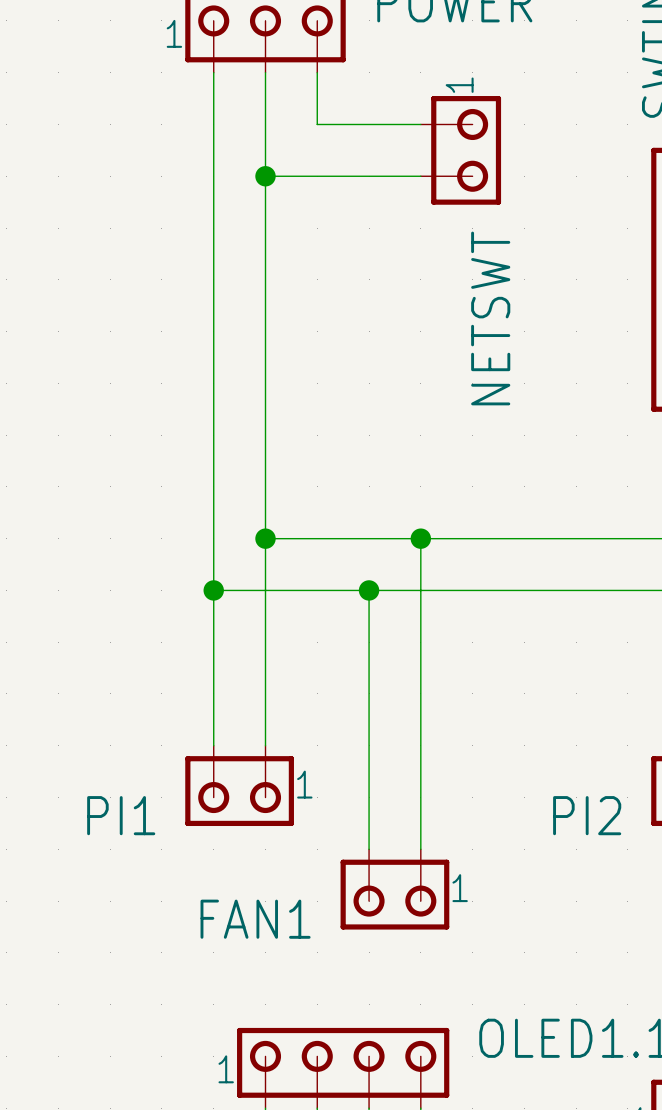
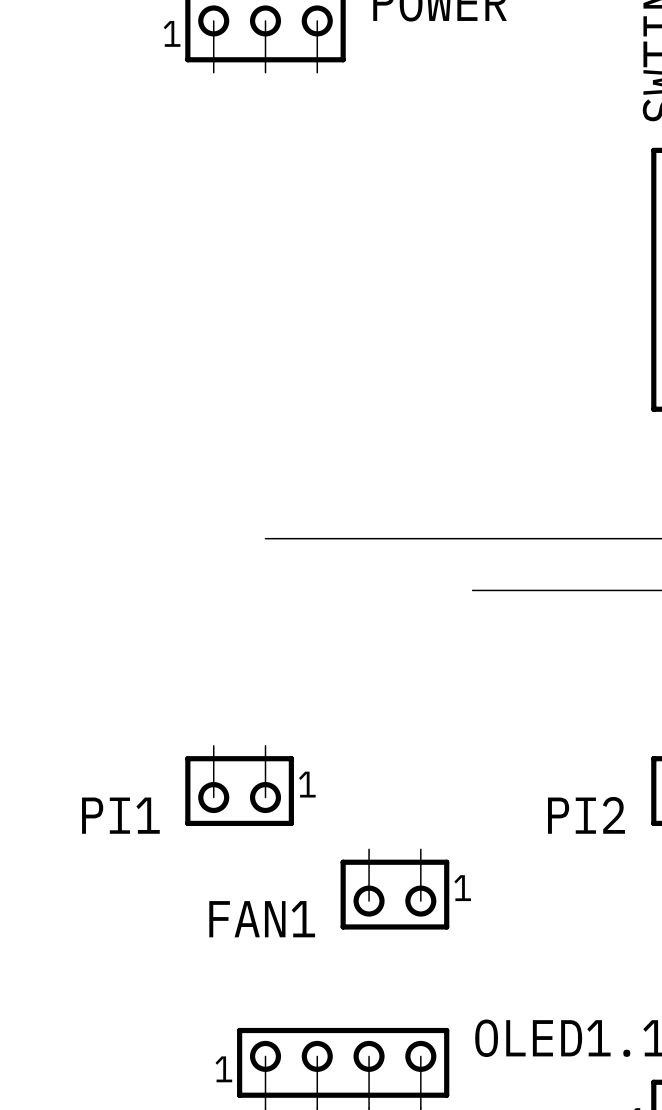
wire: (213, 72) (213, 745) -> none
wire: (265, 72) (265, 745) -> none
wire: (317, 72) (317, 124) (420, 124) -> none
NETSWT: (460, 150) -> none
wire: (265, 176) (420, 176) -> none
junction: (265, 176) -> none
junction: (265, 538) -> none
wire: (420, 538) (420, 849) -> none
junction: (420, 538) -> none
wire: (213, 590) (472, 590) -> none
junction: (213, 590) -> none
wire: (369, 590) (369, 849) -> none
junction: (369, 590) -> none

